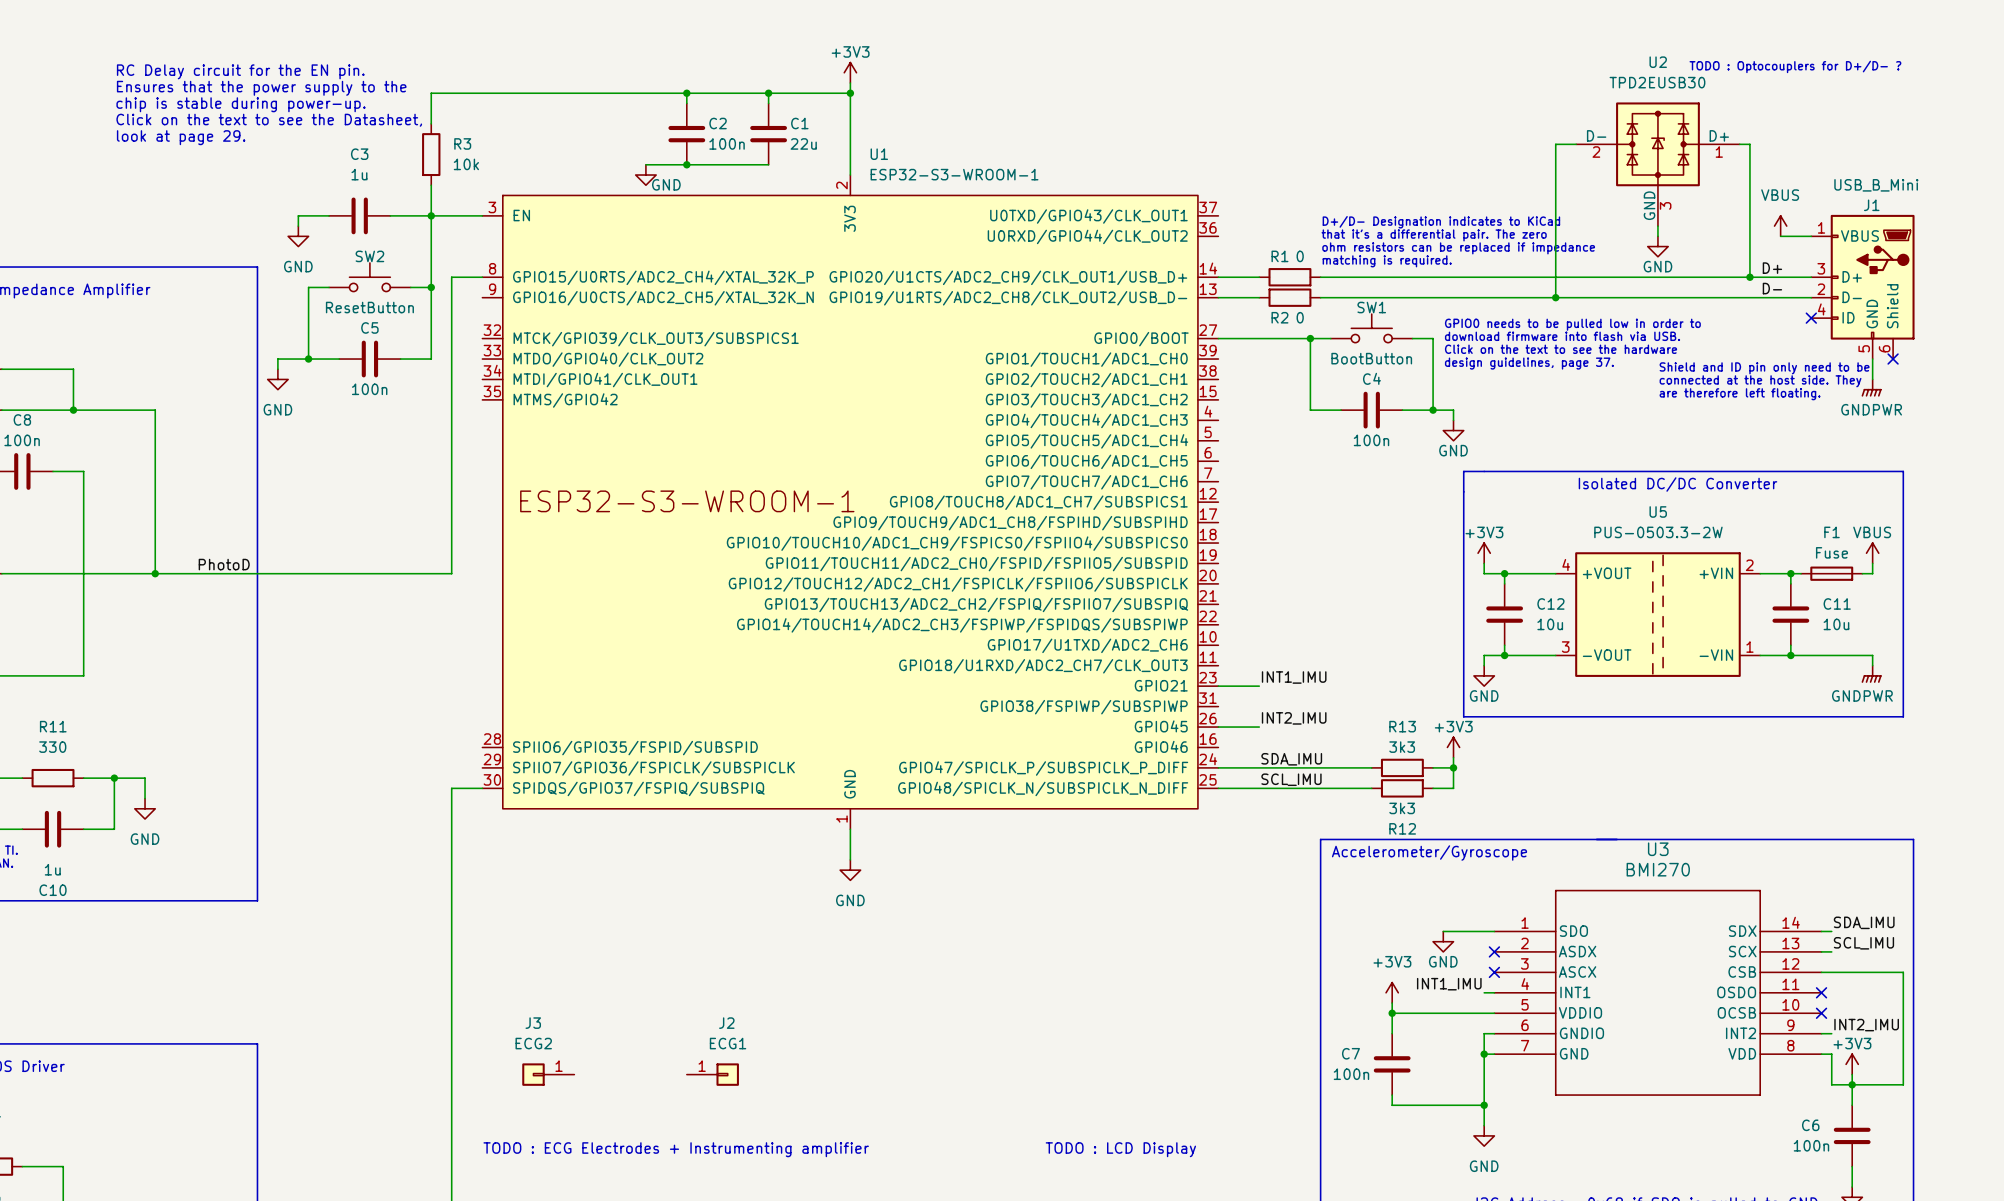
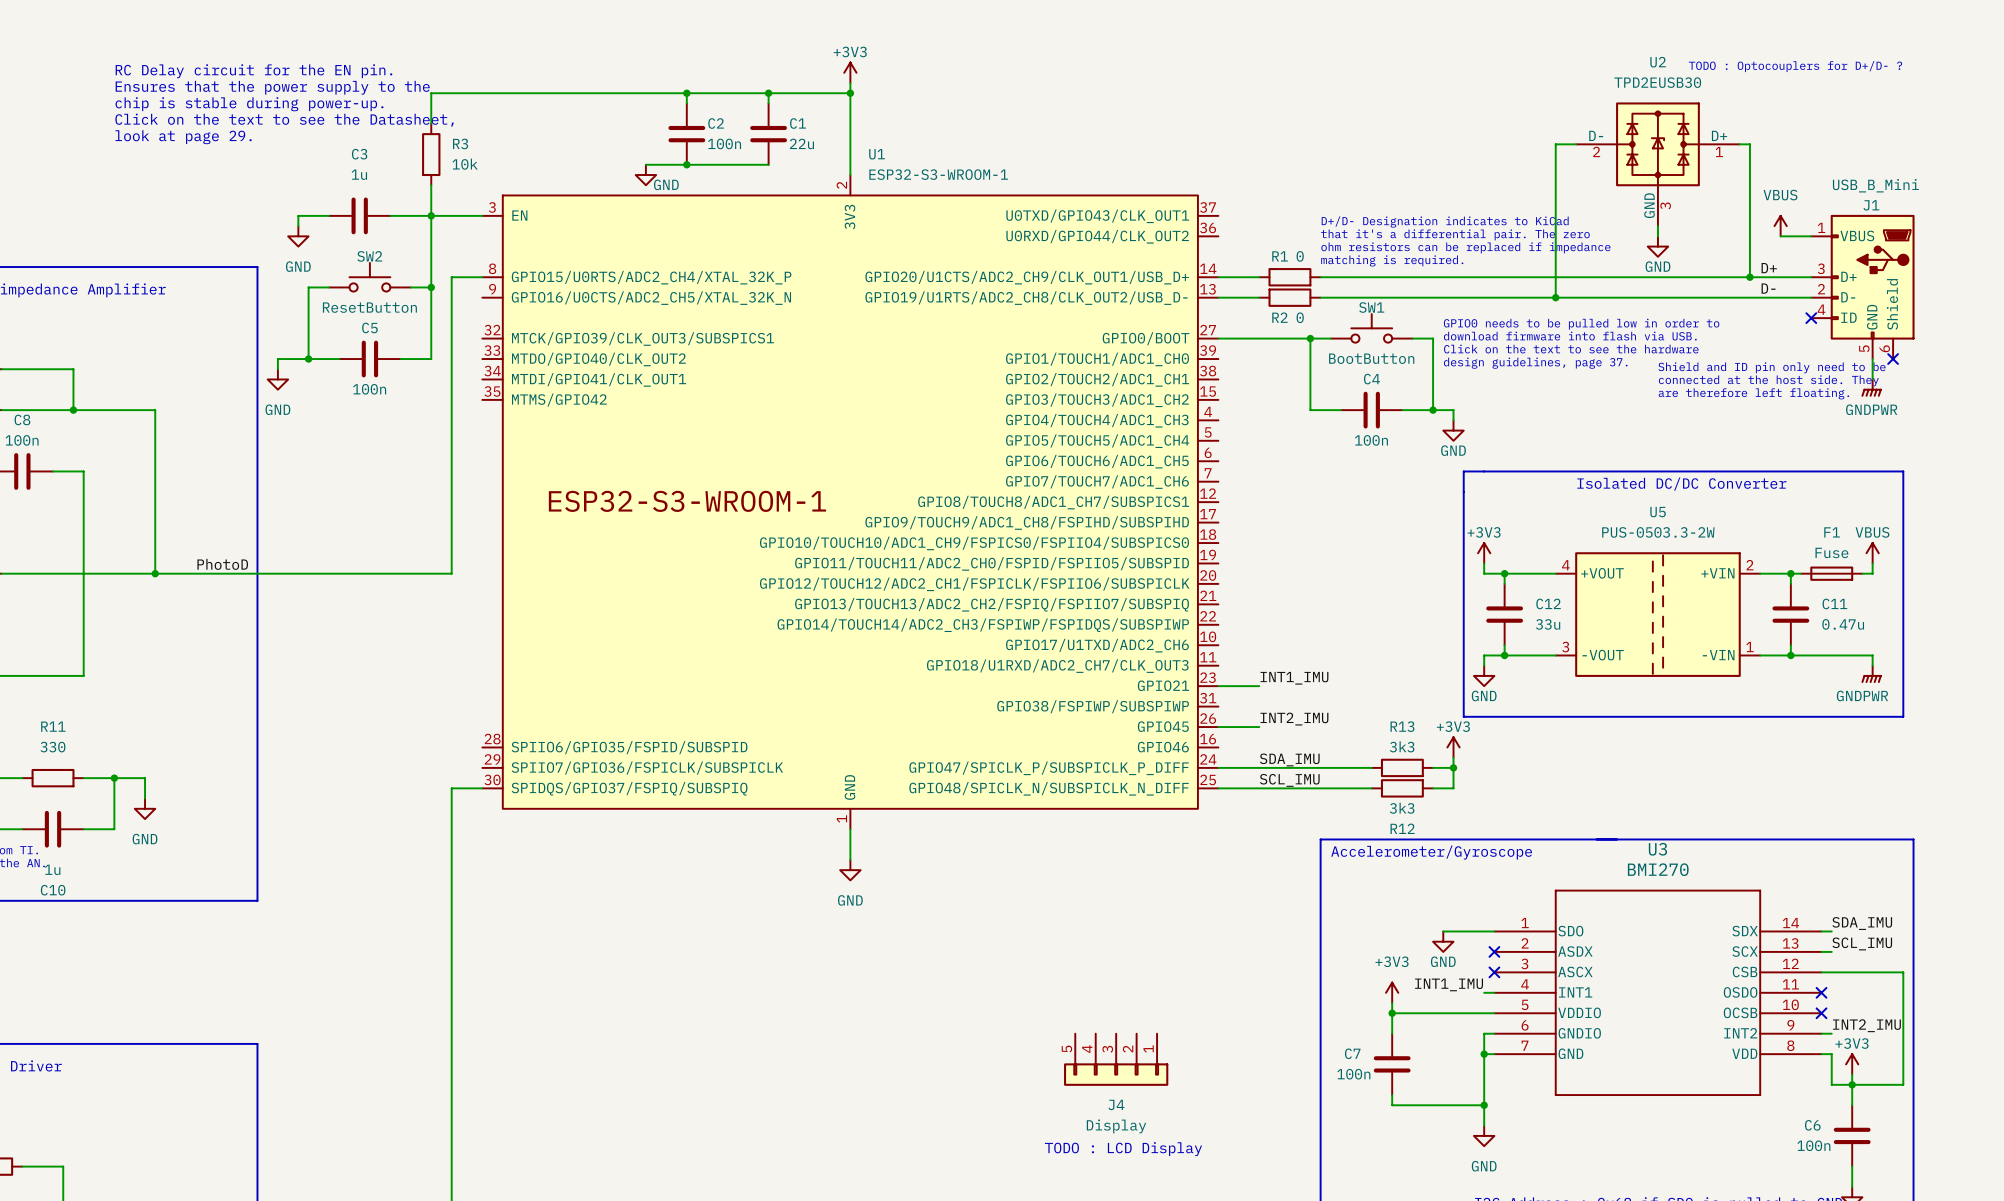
C12 value: 10u (1550, 624) -> 33u (1548, 624)
C11 value: 10u (1836, 624) -> 0.47u (1843, 624)
J4: none -> Display (1116, 1059)
J3: ECG2 (548, 1074) -> none
J2: ECG1 (712, 1074) -> none
text: TODO : ECG Electrodes + Instrumenting amplifier (676, 1149) -> none

